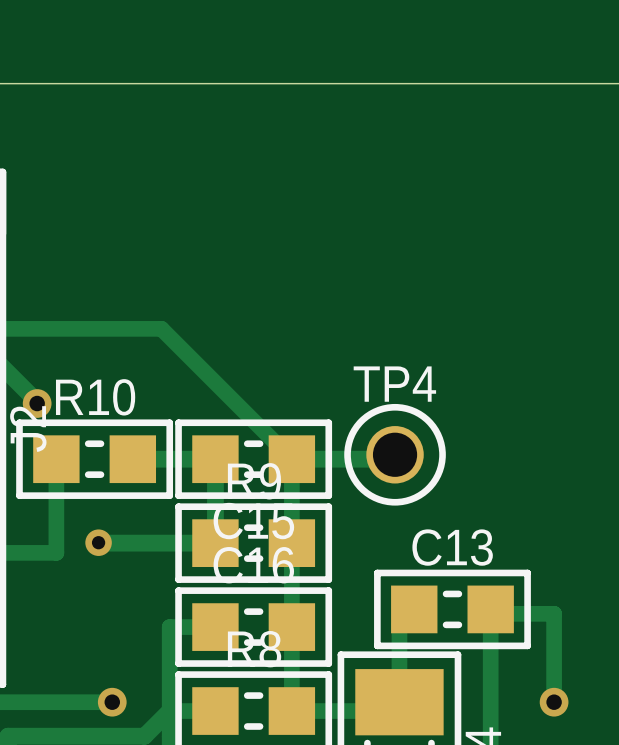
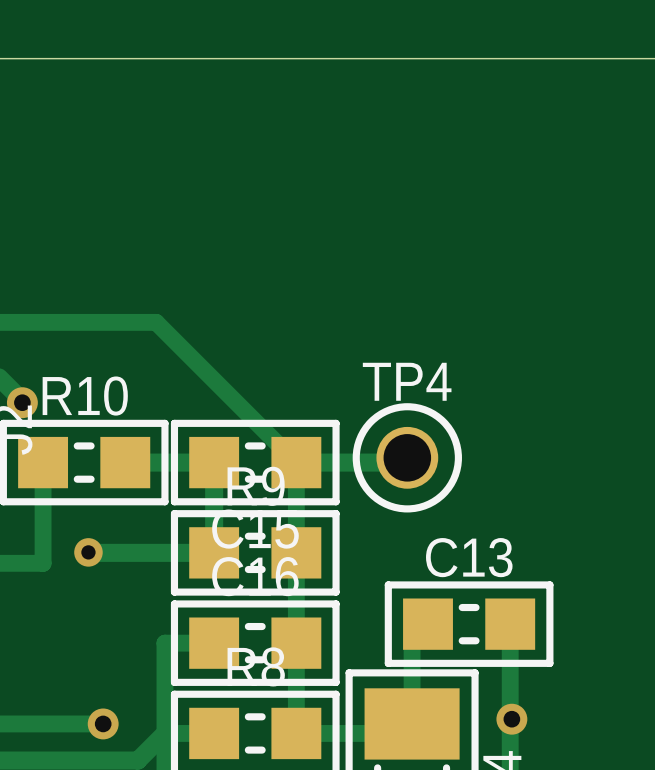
track: (490, 613) (554, 613) (554, 702) -> none
via position: (554, 702) -> (511, 719)

